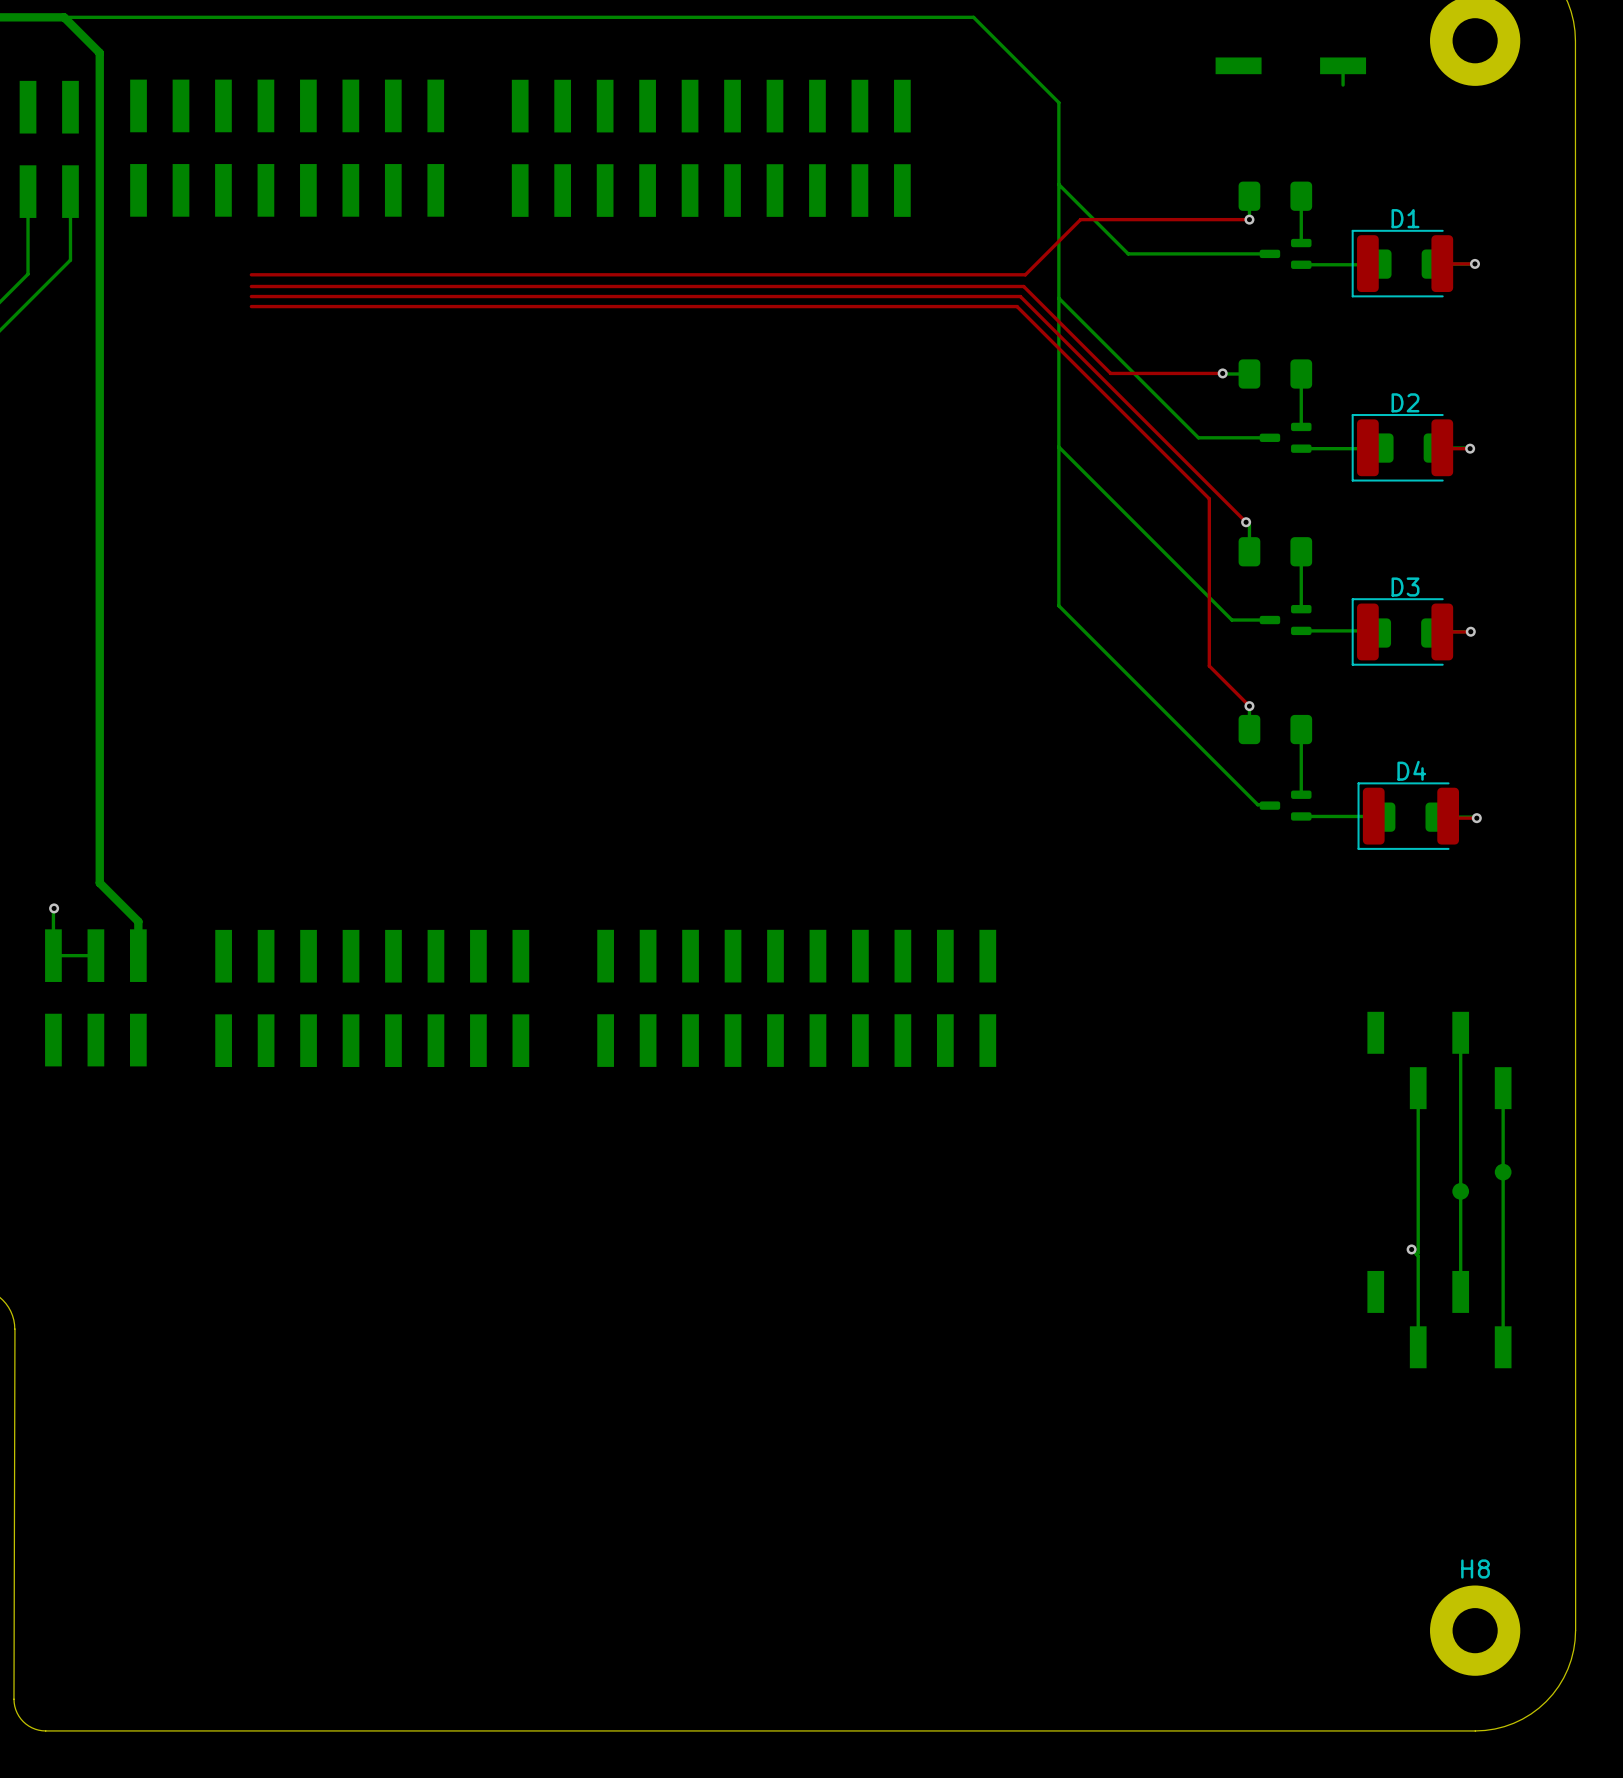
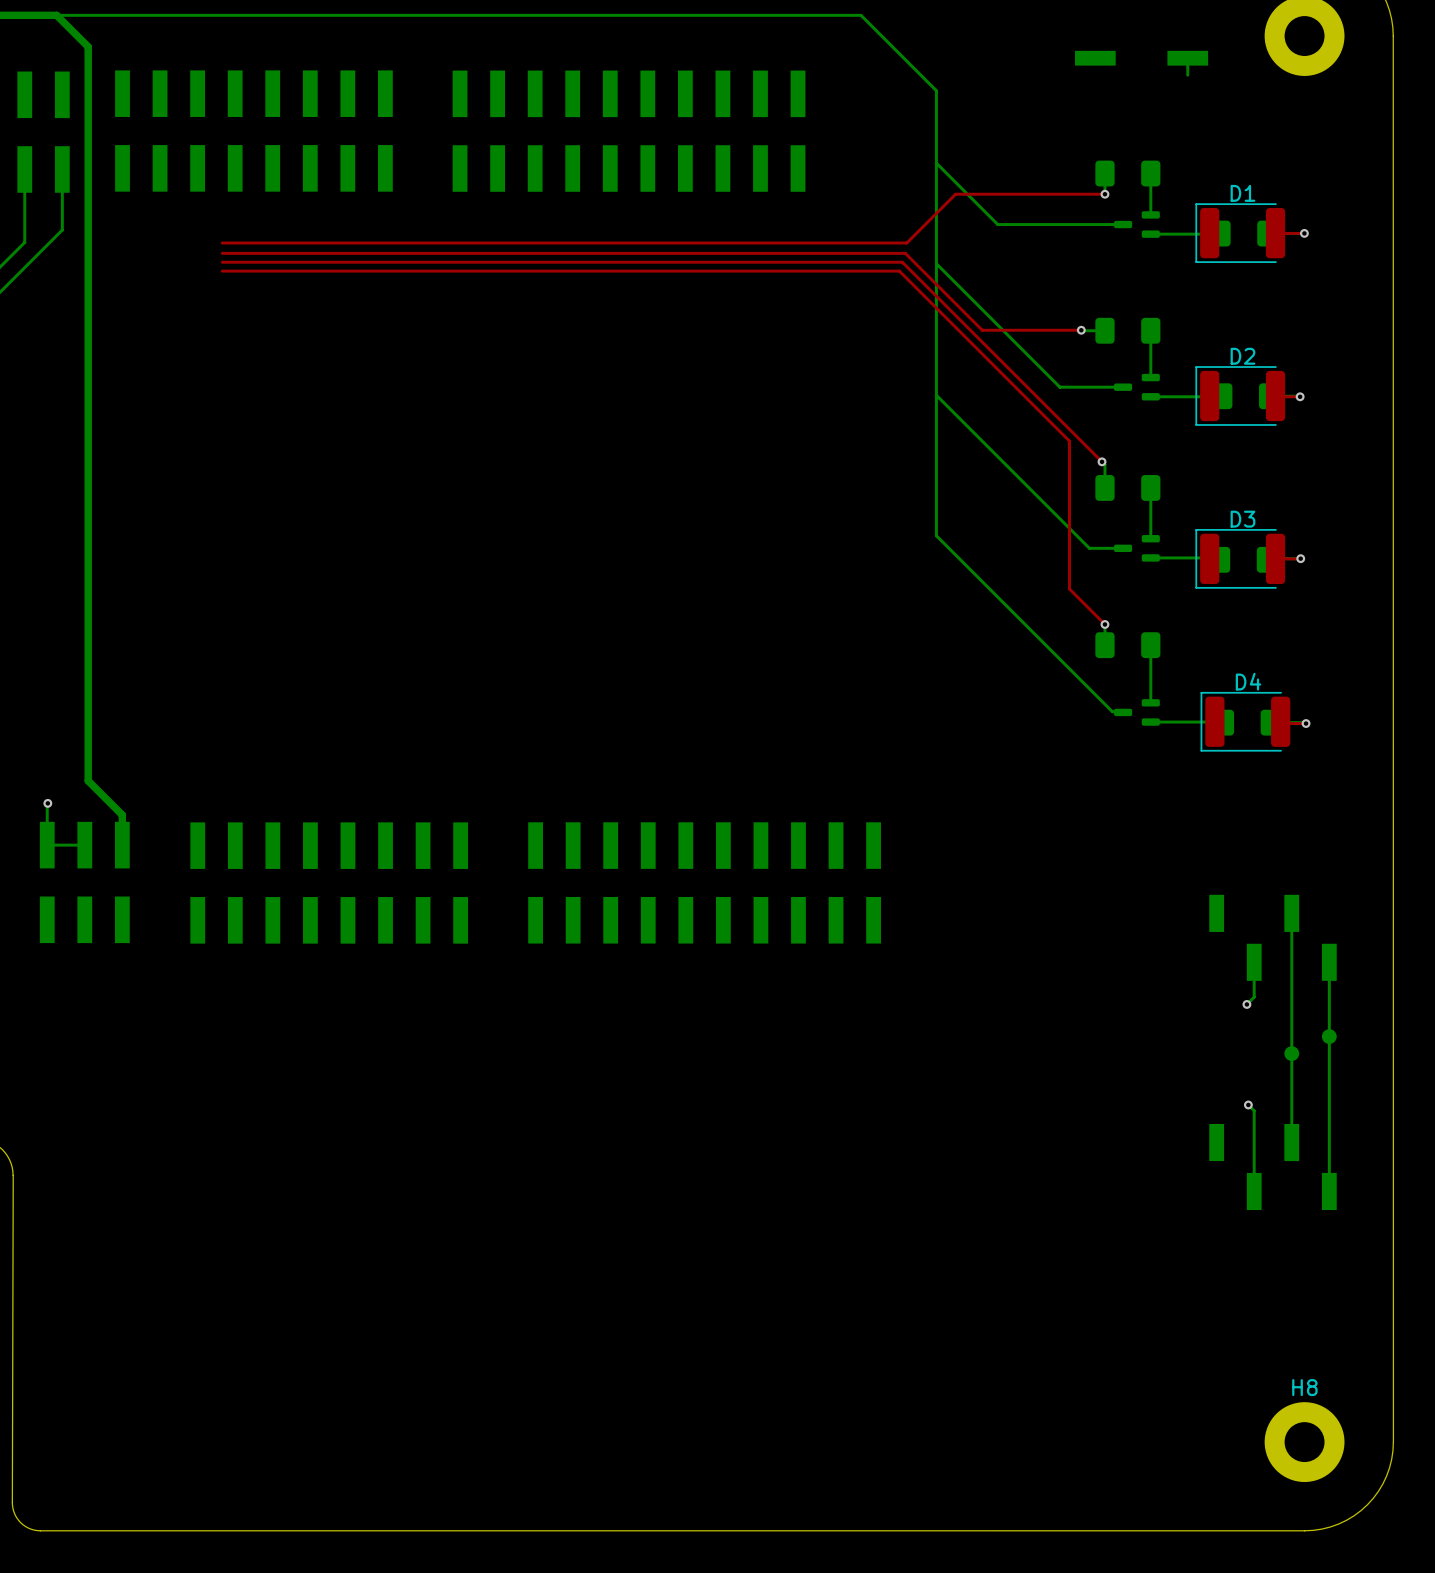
bottom track: (1418, 1127) (1418, 1252) (1416, 1254) -> (1254, 997) (1246, 1004)
via: none -> (1246, 1004)

